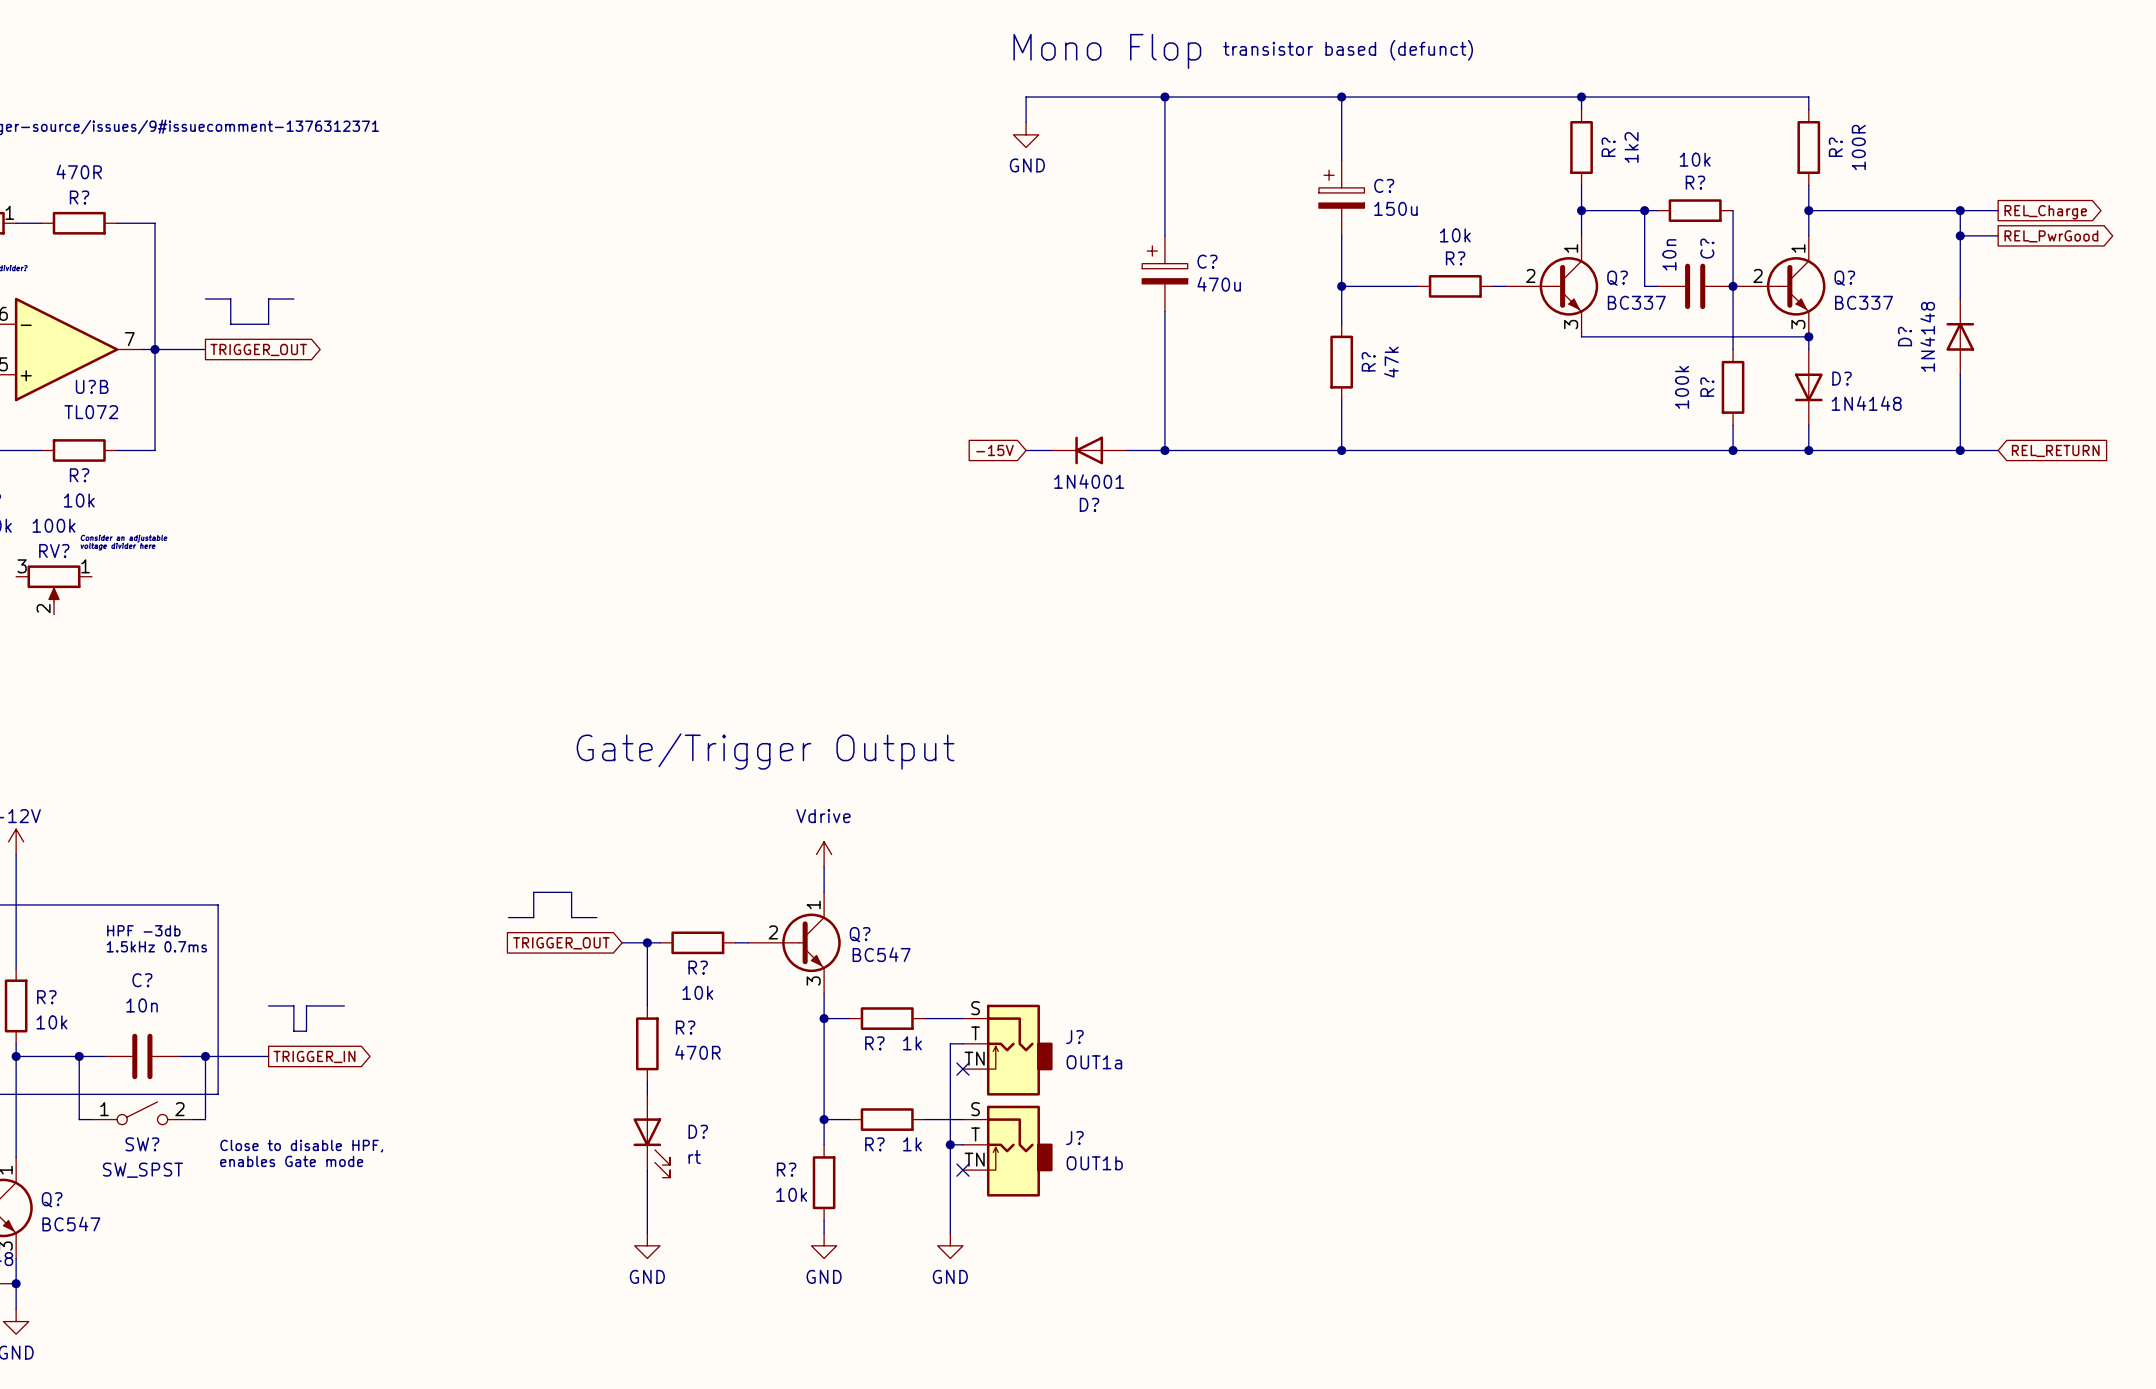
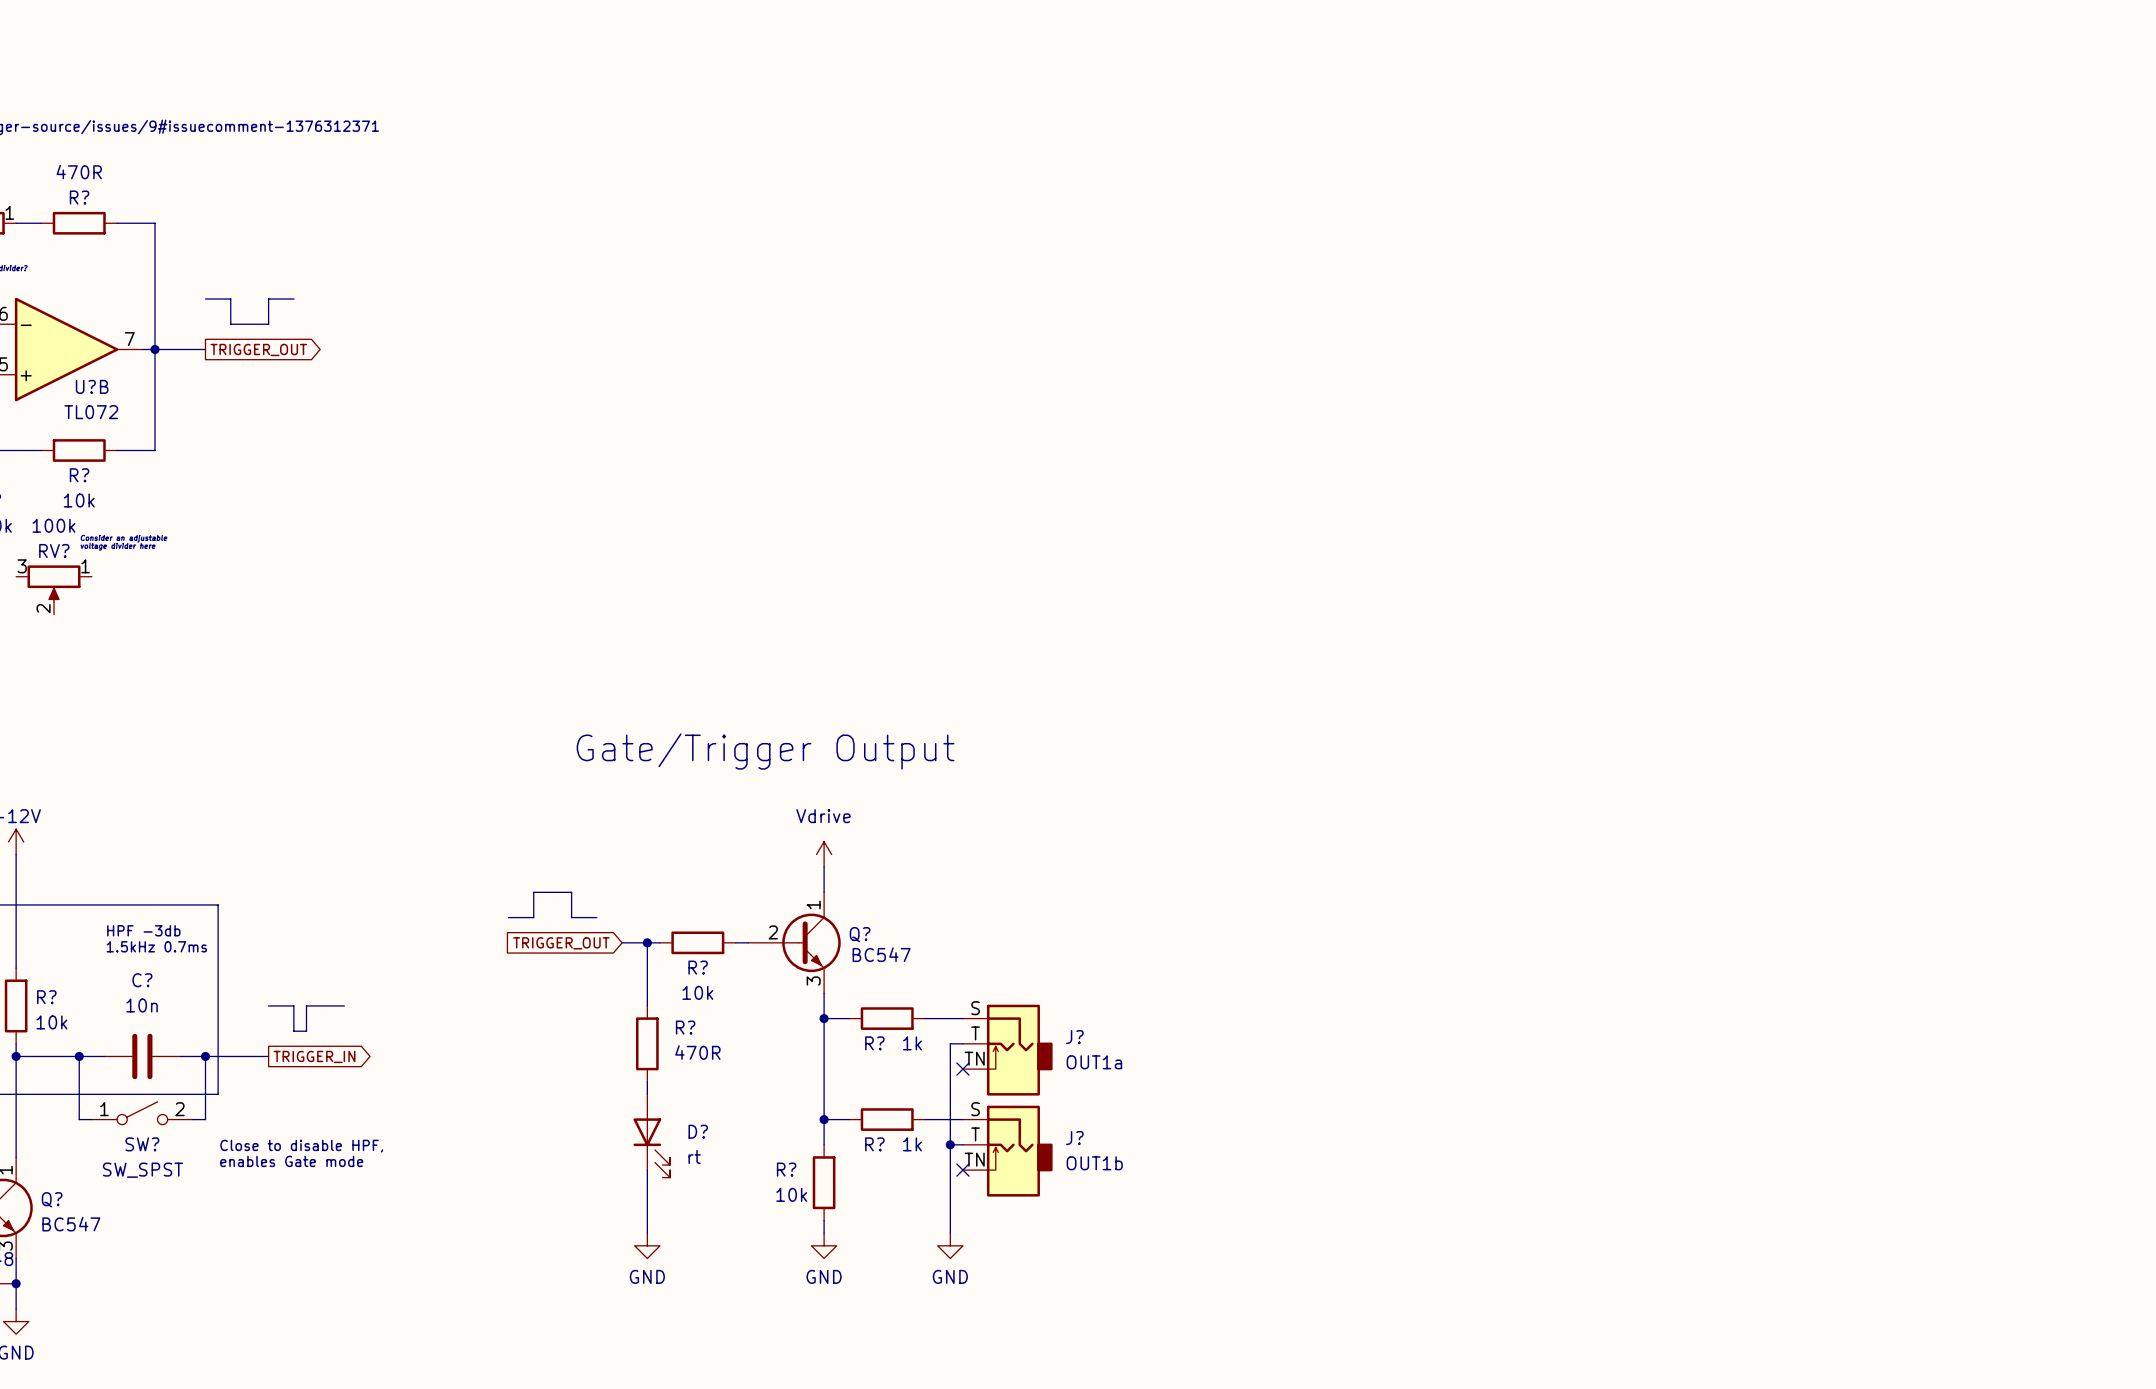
text: transistor based (defunct) (1348, 50) -> none
text: Mono Flop (1107, 51) -> none
wire: (1164, 97) (1164, 235) -> none
junction: (1164, 97) -> none
wire: (1341, 97) (1341, 160) -> none
junction: (1341, 97) -> none
wire: (1581, 97) (1581, 109) -> none
junction: (1581, 97) -> none
wire: (1808, 109) (1808, 97) (1026, 97) (1026, 122) -> none
power symbol: GND (1026, 134) -> none
R?: 1k2 (1581, 147) -> none
R?: 100R (1808, 147) -> none
wire: (1581, 185) (1581, 235) -> none
wire: (1808, 185) (1808, 235) -> none
C?: 150u (1341, 198) -> none
wire: (1581, 210) (1657, 210) -> none
junction: (1581, 210) -> none
wire: (1644, 210) (1644, 286) (1657, 286) -> none
junction: (1644, 210) -> none
R?: 10k (1695, 210) -> none
wire: (1733, 210) (1733, 349) -> none
wire: (1808, 210) (1998, 210) -> none
junction: (1808, 210) -> none
wire: (1960, 210) (1960, 299) -> none
junction: (1960, 210) -> none
global label: REL_Charge (2045, 212) -> none
wire: (1341, 235) (1341, 324) -> none
wire: (1960, 235) (1998, 235) -> none
junction: (1960, 235) -> none
global label: REL_PwrGood (2051, 236) -> none
C?: 470u (1164, 273) -> none
wire: (1341, 286) (1417, 286) -> none
junction: (1341, 286) -> none
R?: 10k (1455, 286) -> none
wire: (1493, 286) (1505, 286) -> none
Q?: BC337 (1552, 286) -> none
C?: 10n (1695, 286) -> none
junction: (1733, 286) -> none
Q?: BC337 (1779, 286) -> none
wire: (1164, 311) (1164, 450) -> none
wire: (1581, 336) (1808, 336) (1808, 349) -> none
junction: (1808, 336) -> none
D?: 1N4148 (1960, 336) -> none
R?: 47k (1341, 362) -> none
wire: (1960, 374) (1960, 450) -> none
R?: 100k (1733, 387) -> none
D?: 1N4148 (1808, 387) -> none
wire: (1341, 399) (1341, 450) -> none
wire: (1733, 425) (1733, 450) -> none
wire: (1808, 425) (1808, 450) -> none
global label: -15V (995, 450) -> none
wire: (1026, 450) (1051, 450) -> none
D?: 1N4001 (1089, 450) -> none
wire: (1127, 450) (1998, 450) -> none
junction: (1164, 450) -> none
junction: (1341, 450) -> none
junction: (1733, 450) -> none
junction: (1808, 450) -> none
junction: (1960, 450) -> none
global label: REL_RETURN (2055, 450) -> none

